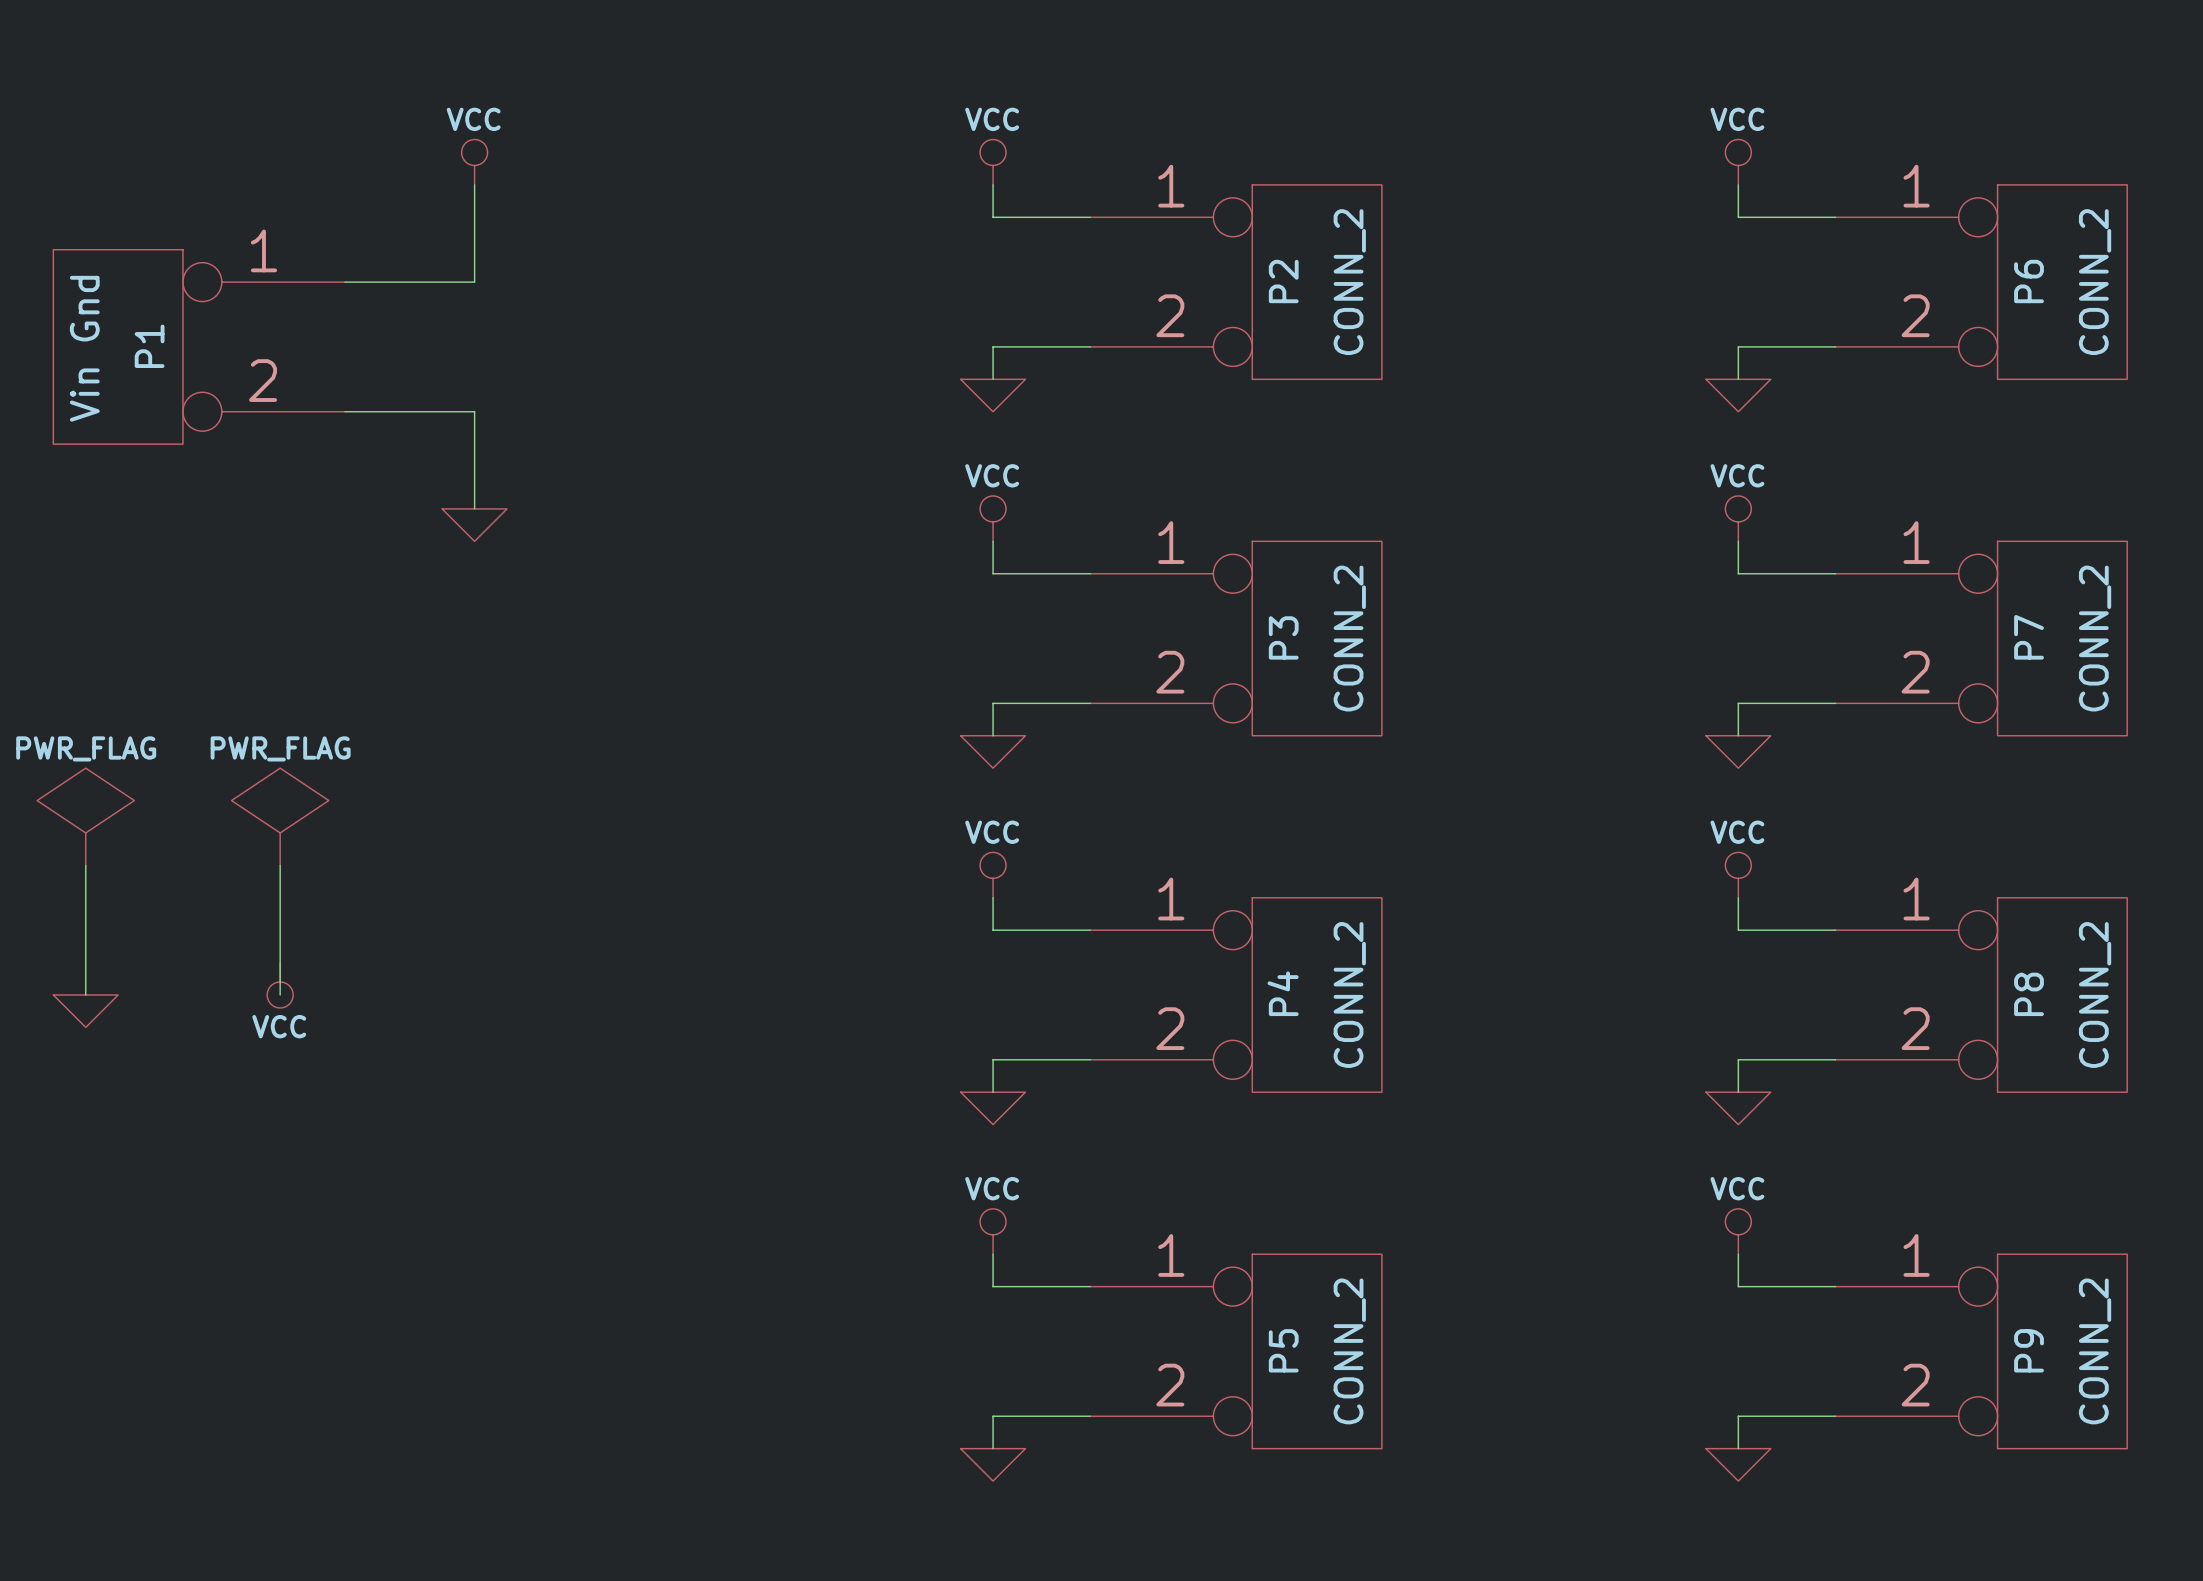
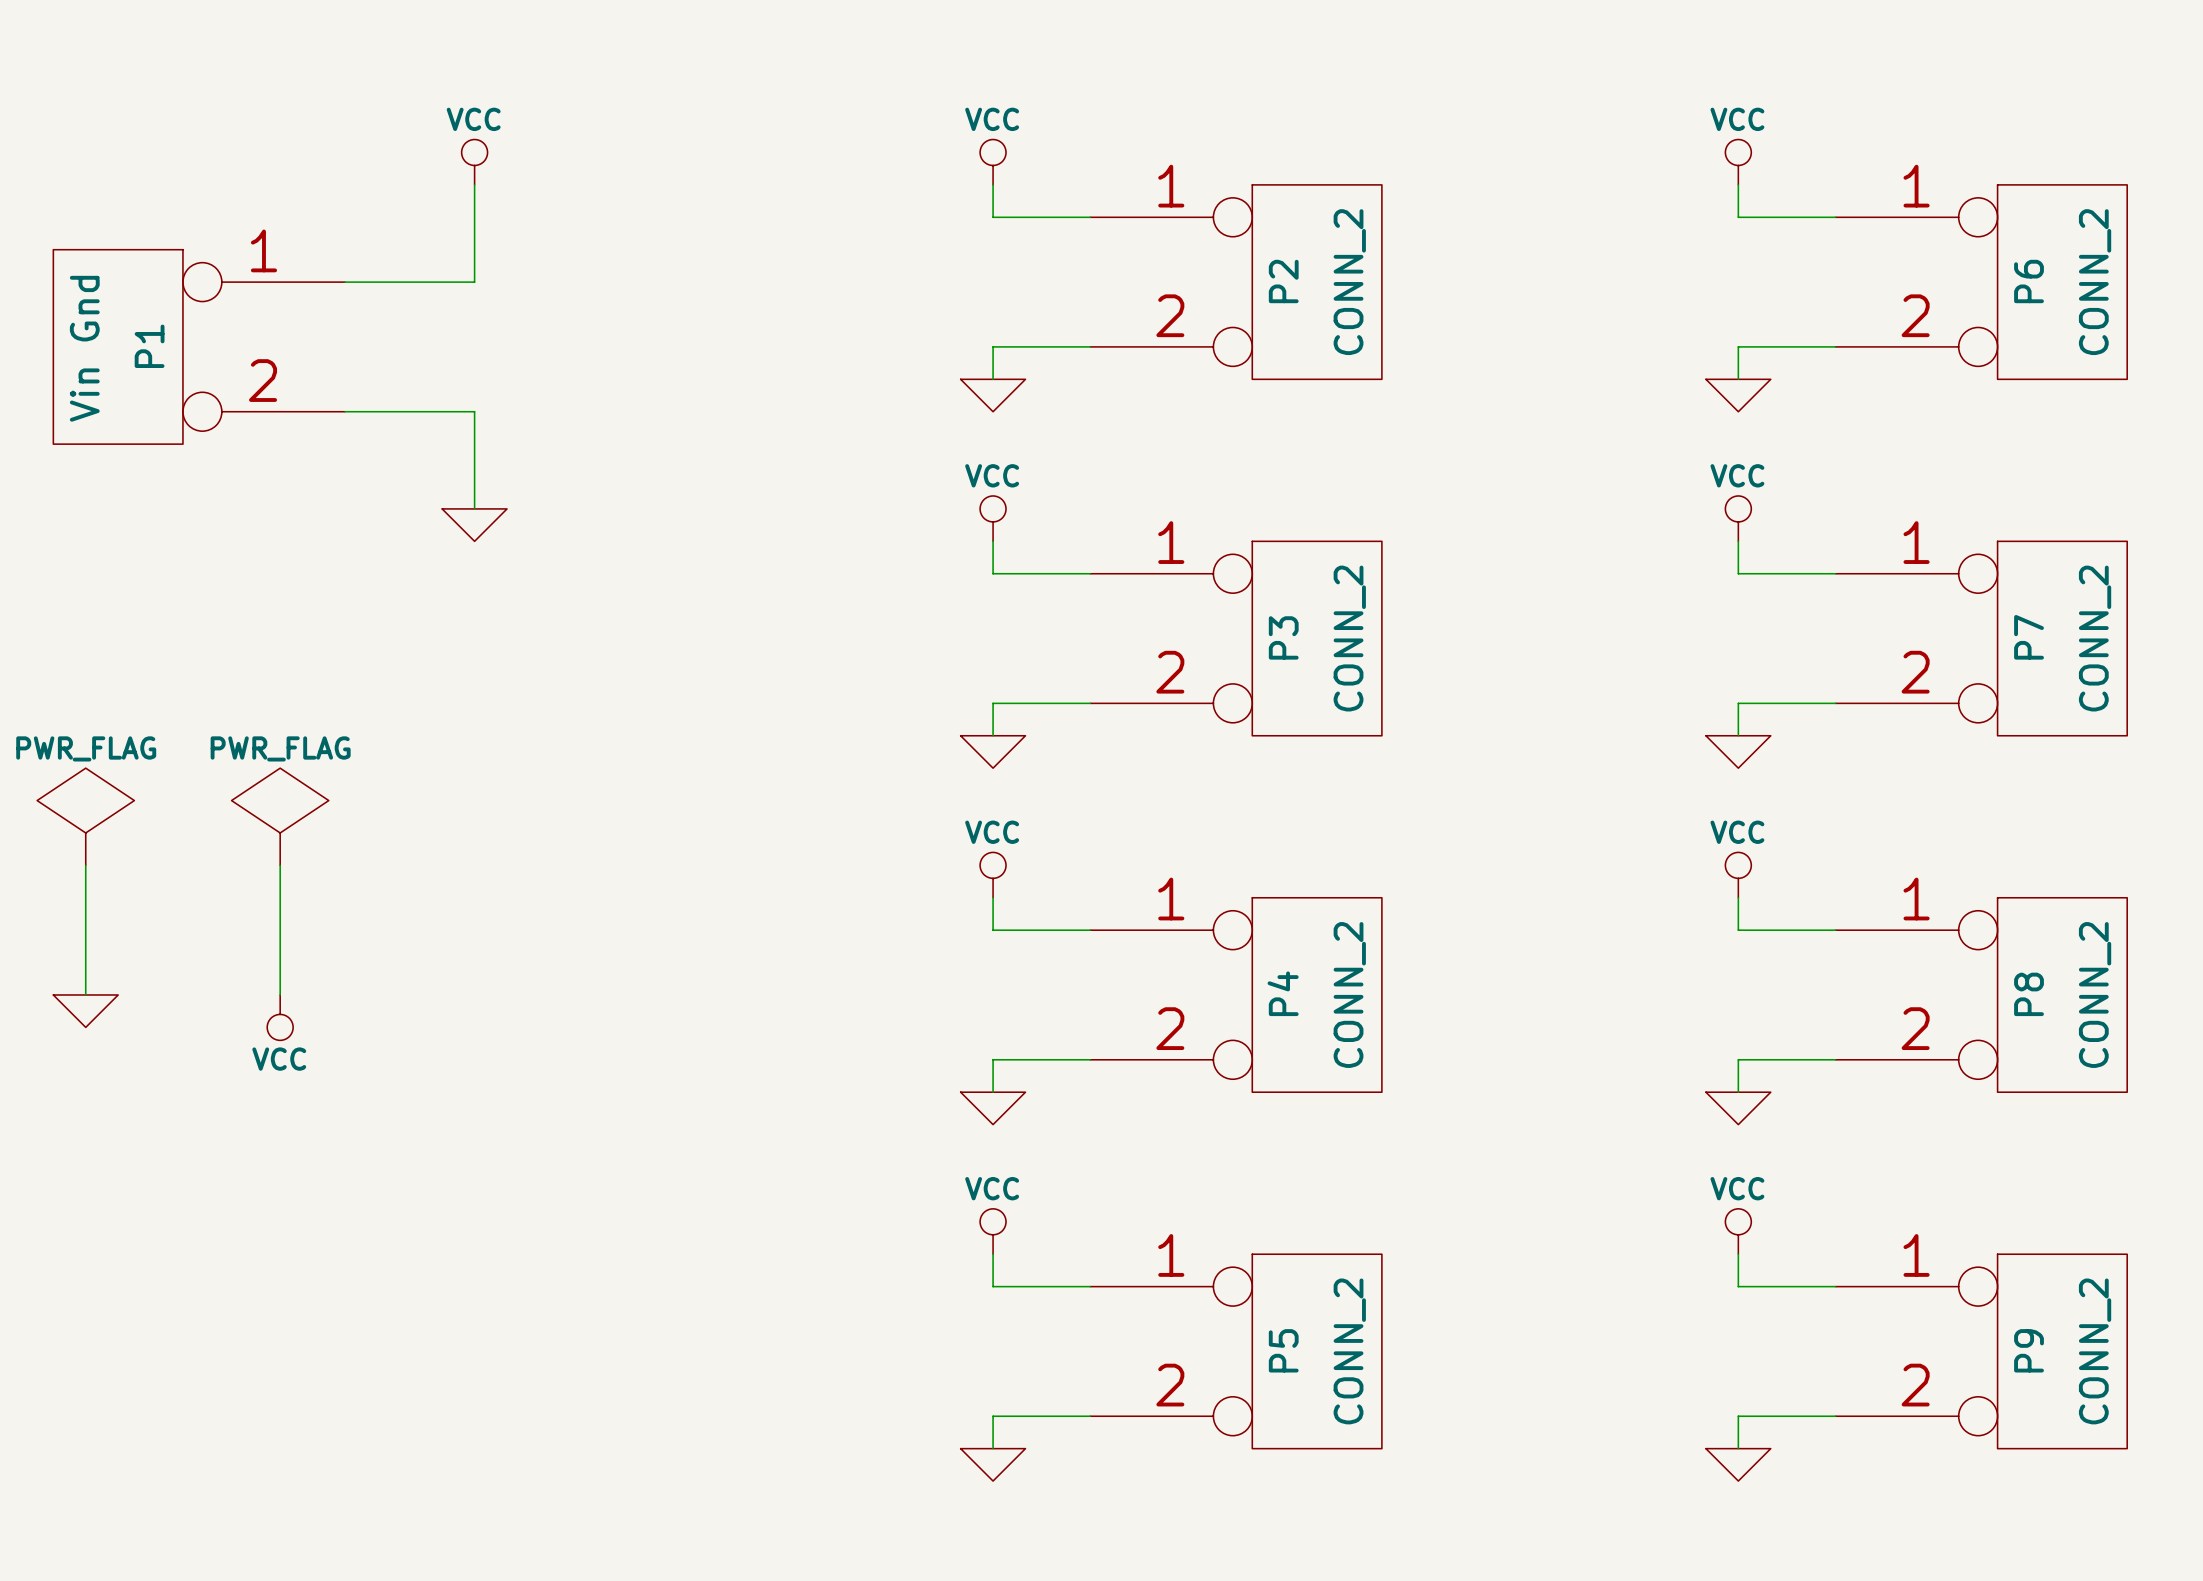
power symbol position: VCC (280, 985) -> VCC (280, 1017)

